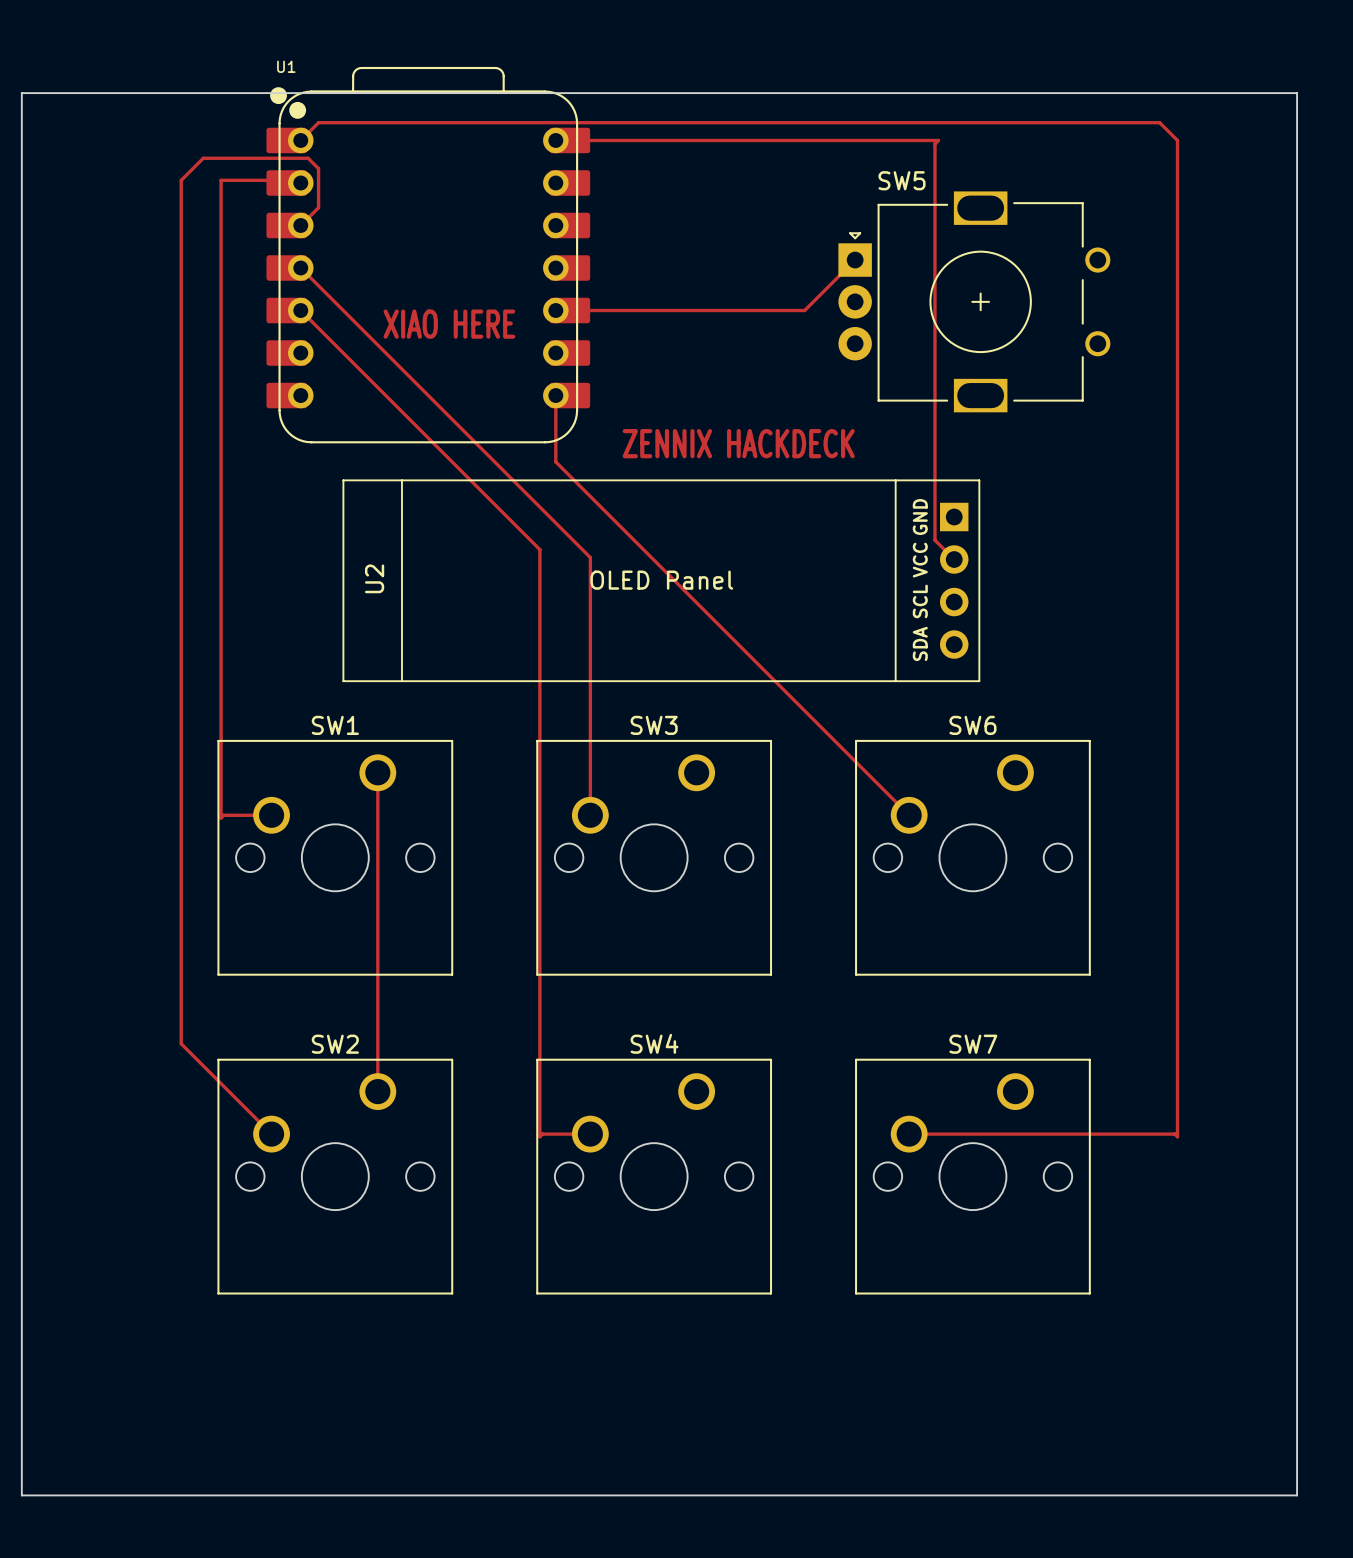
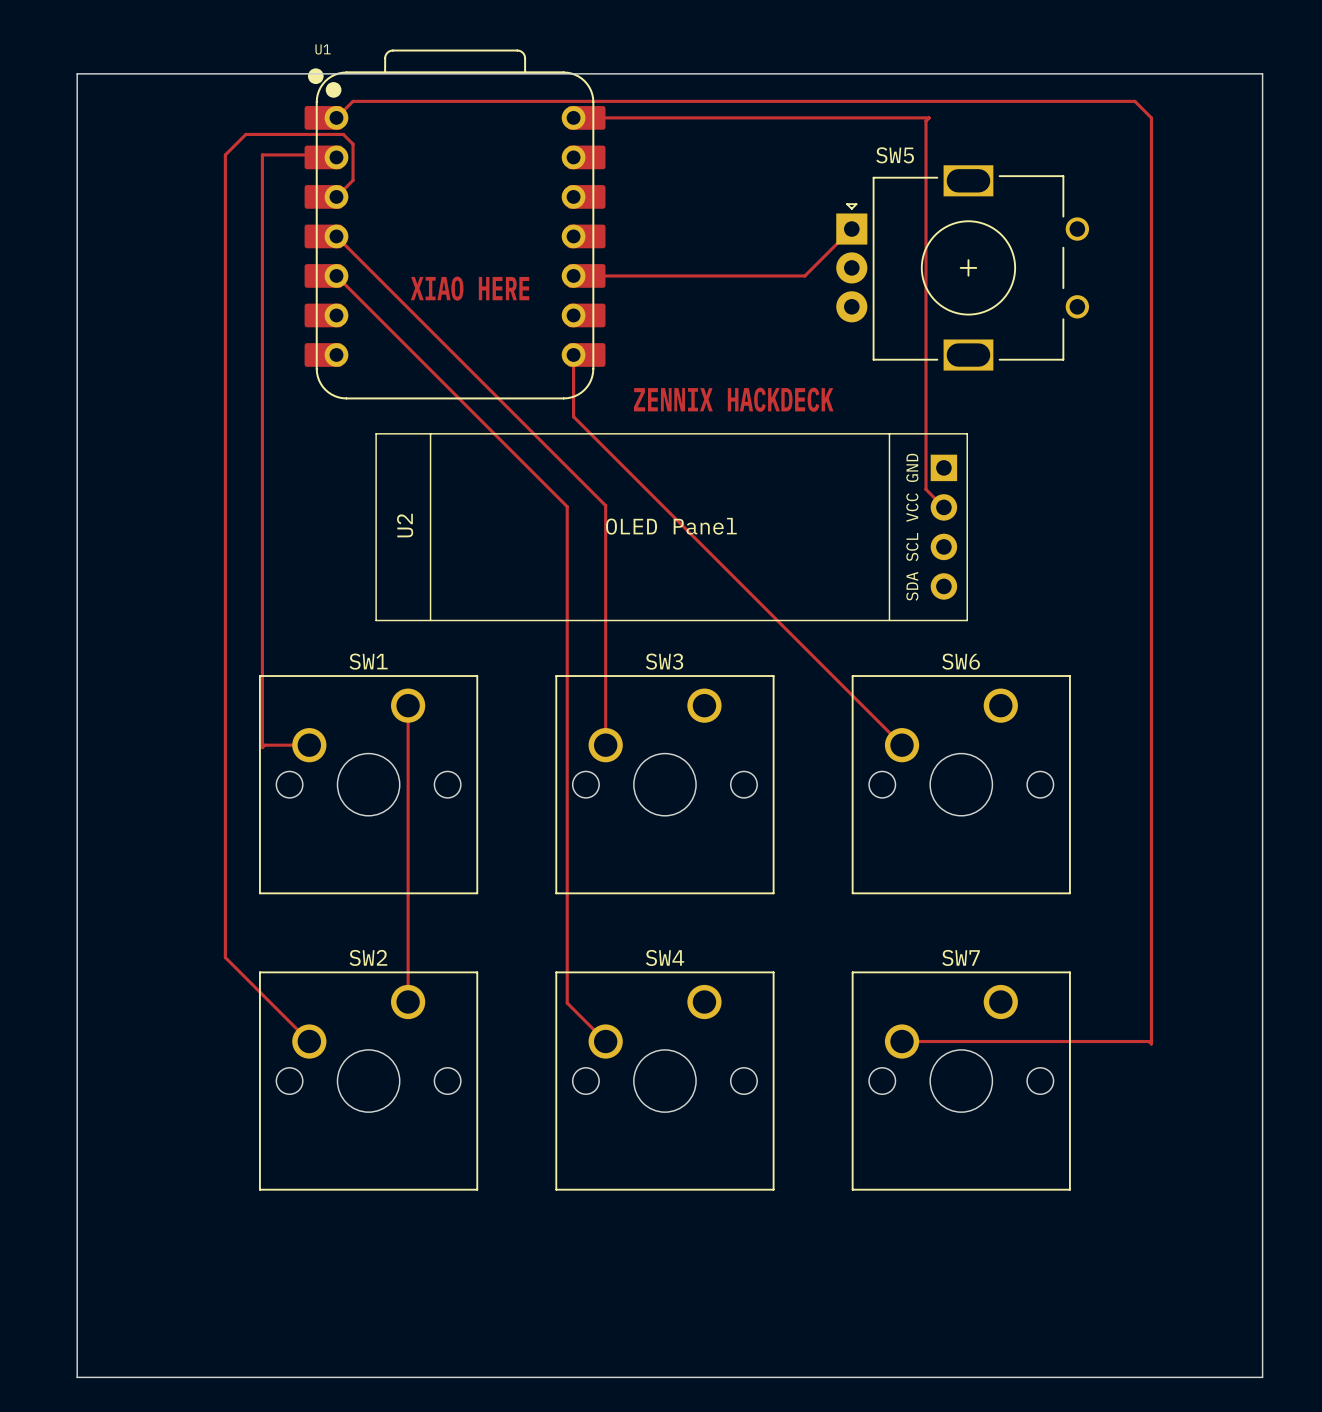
track: (539, 549) (539, 1136) (542, 1134) (590, 1134) -> (558, 498) (567, 506) (567, 1003) (605, 1041)

